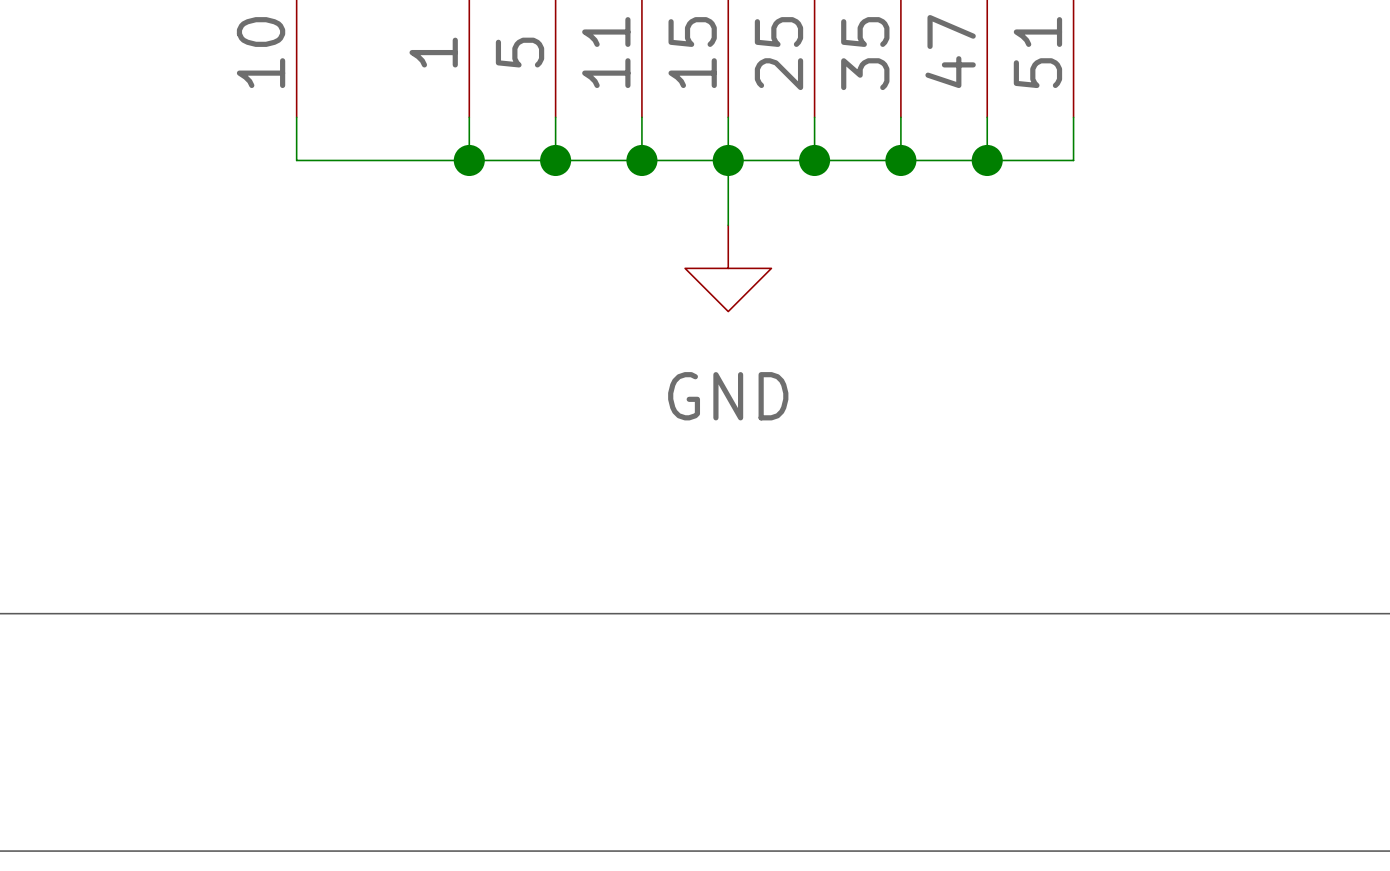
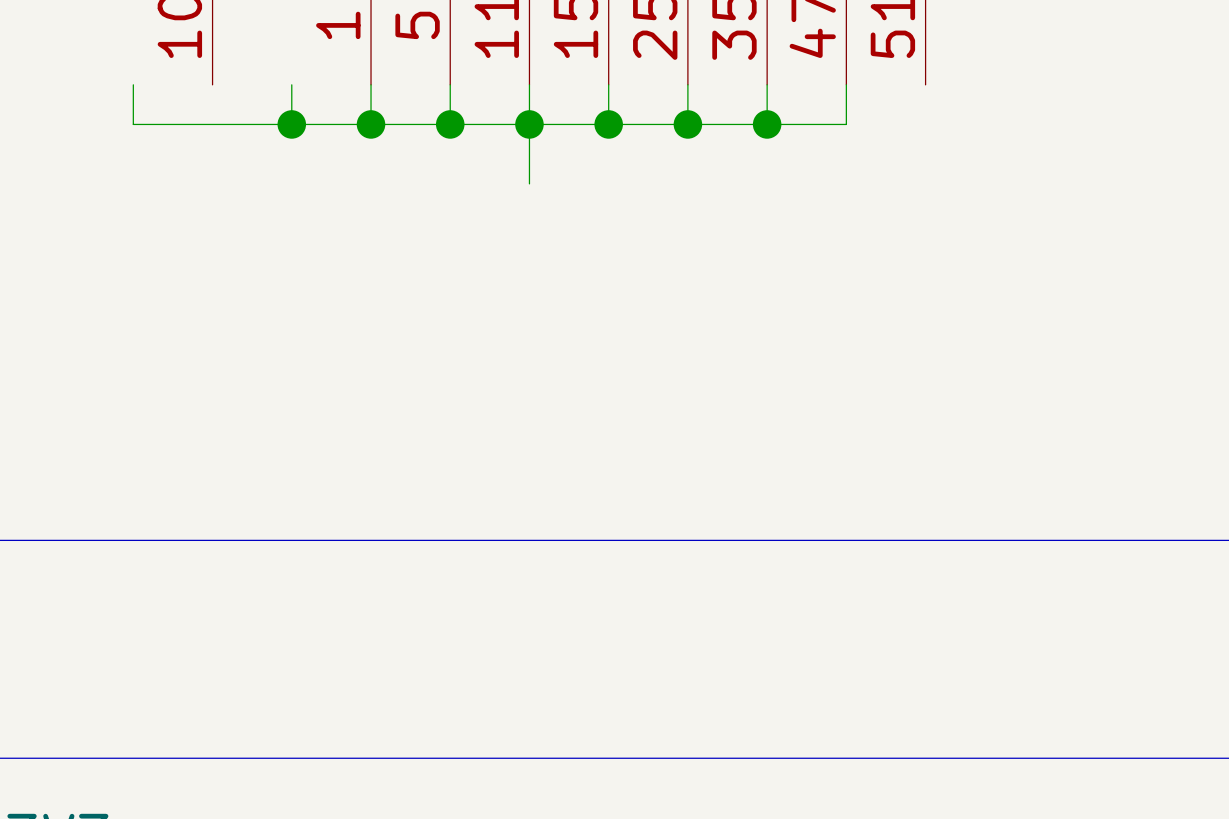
wire: (296, 117) (296, 160) -> (133, 84) (133, 124) (212, 124)
wire: none -> (291, 84) (291, 124)
wire: (1073, 117) (1073, 160) (987, 160) -> none
junction: none -> (291, 124)
wire: (728, 160) (728, 225) -> (529, 124) (529, 183)
junction: (987, 160) -> none
power symbol: GND (728, 268) -> none

